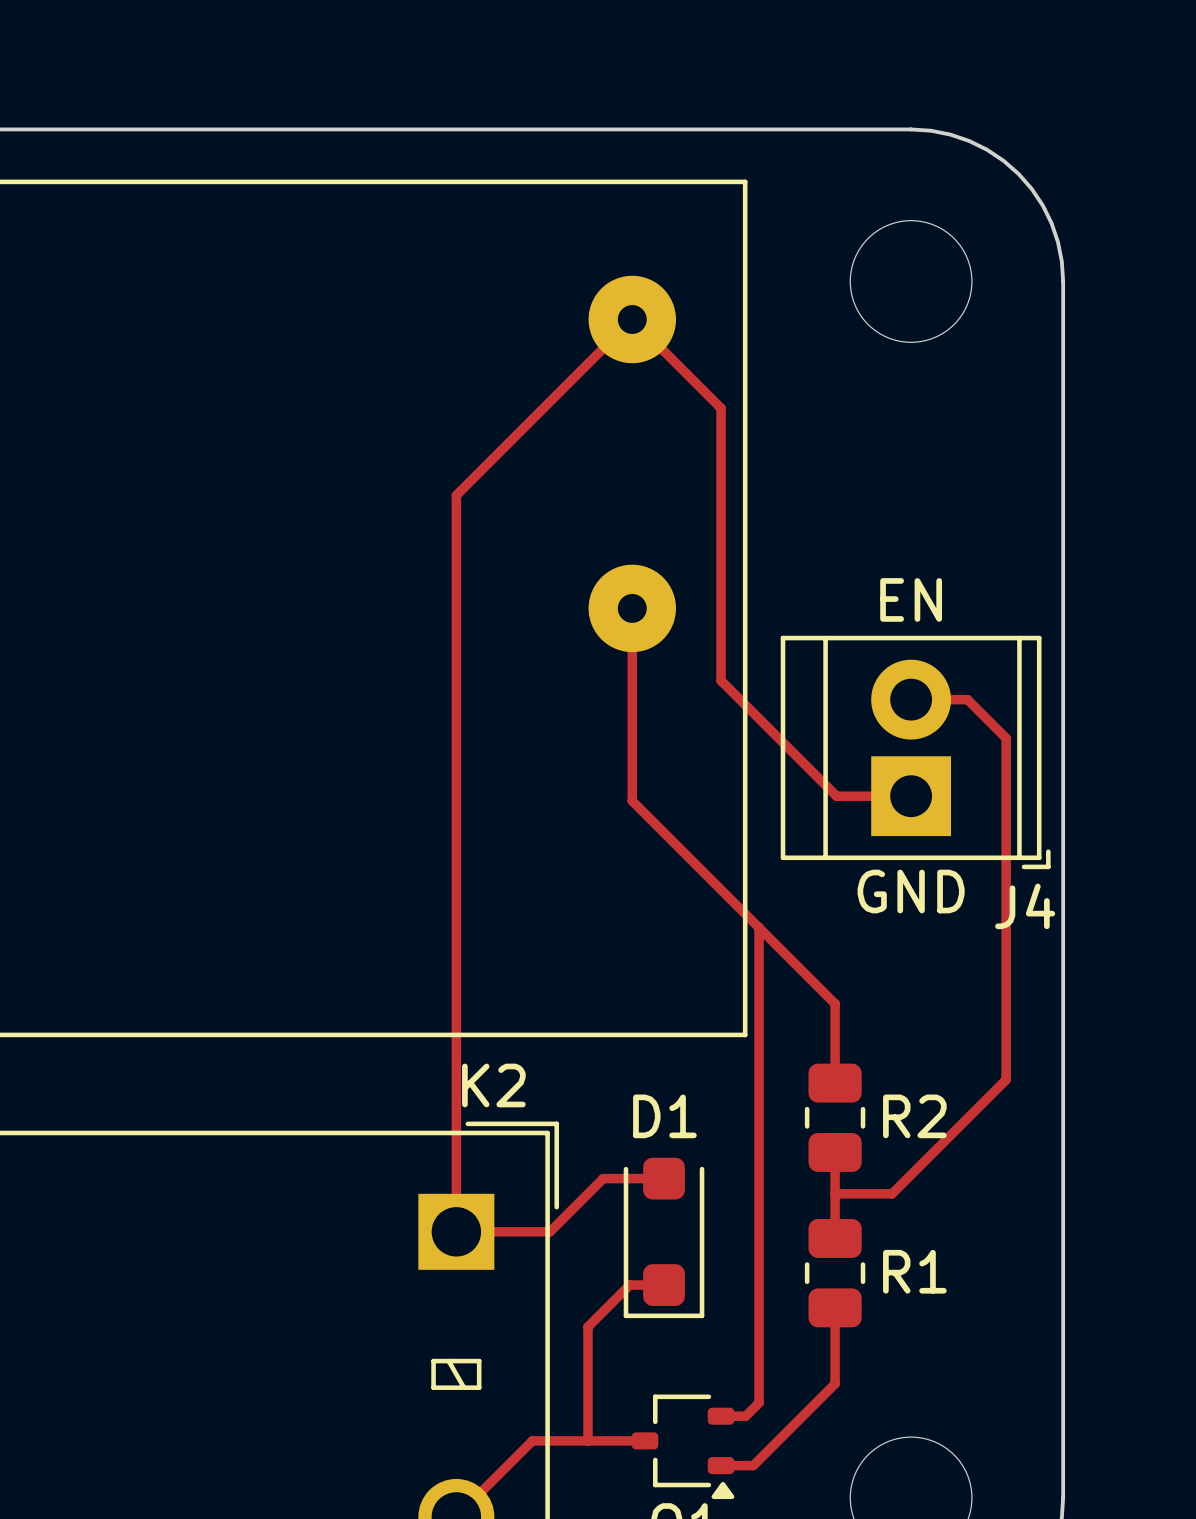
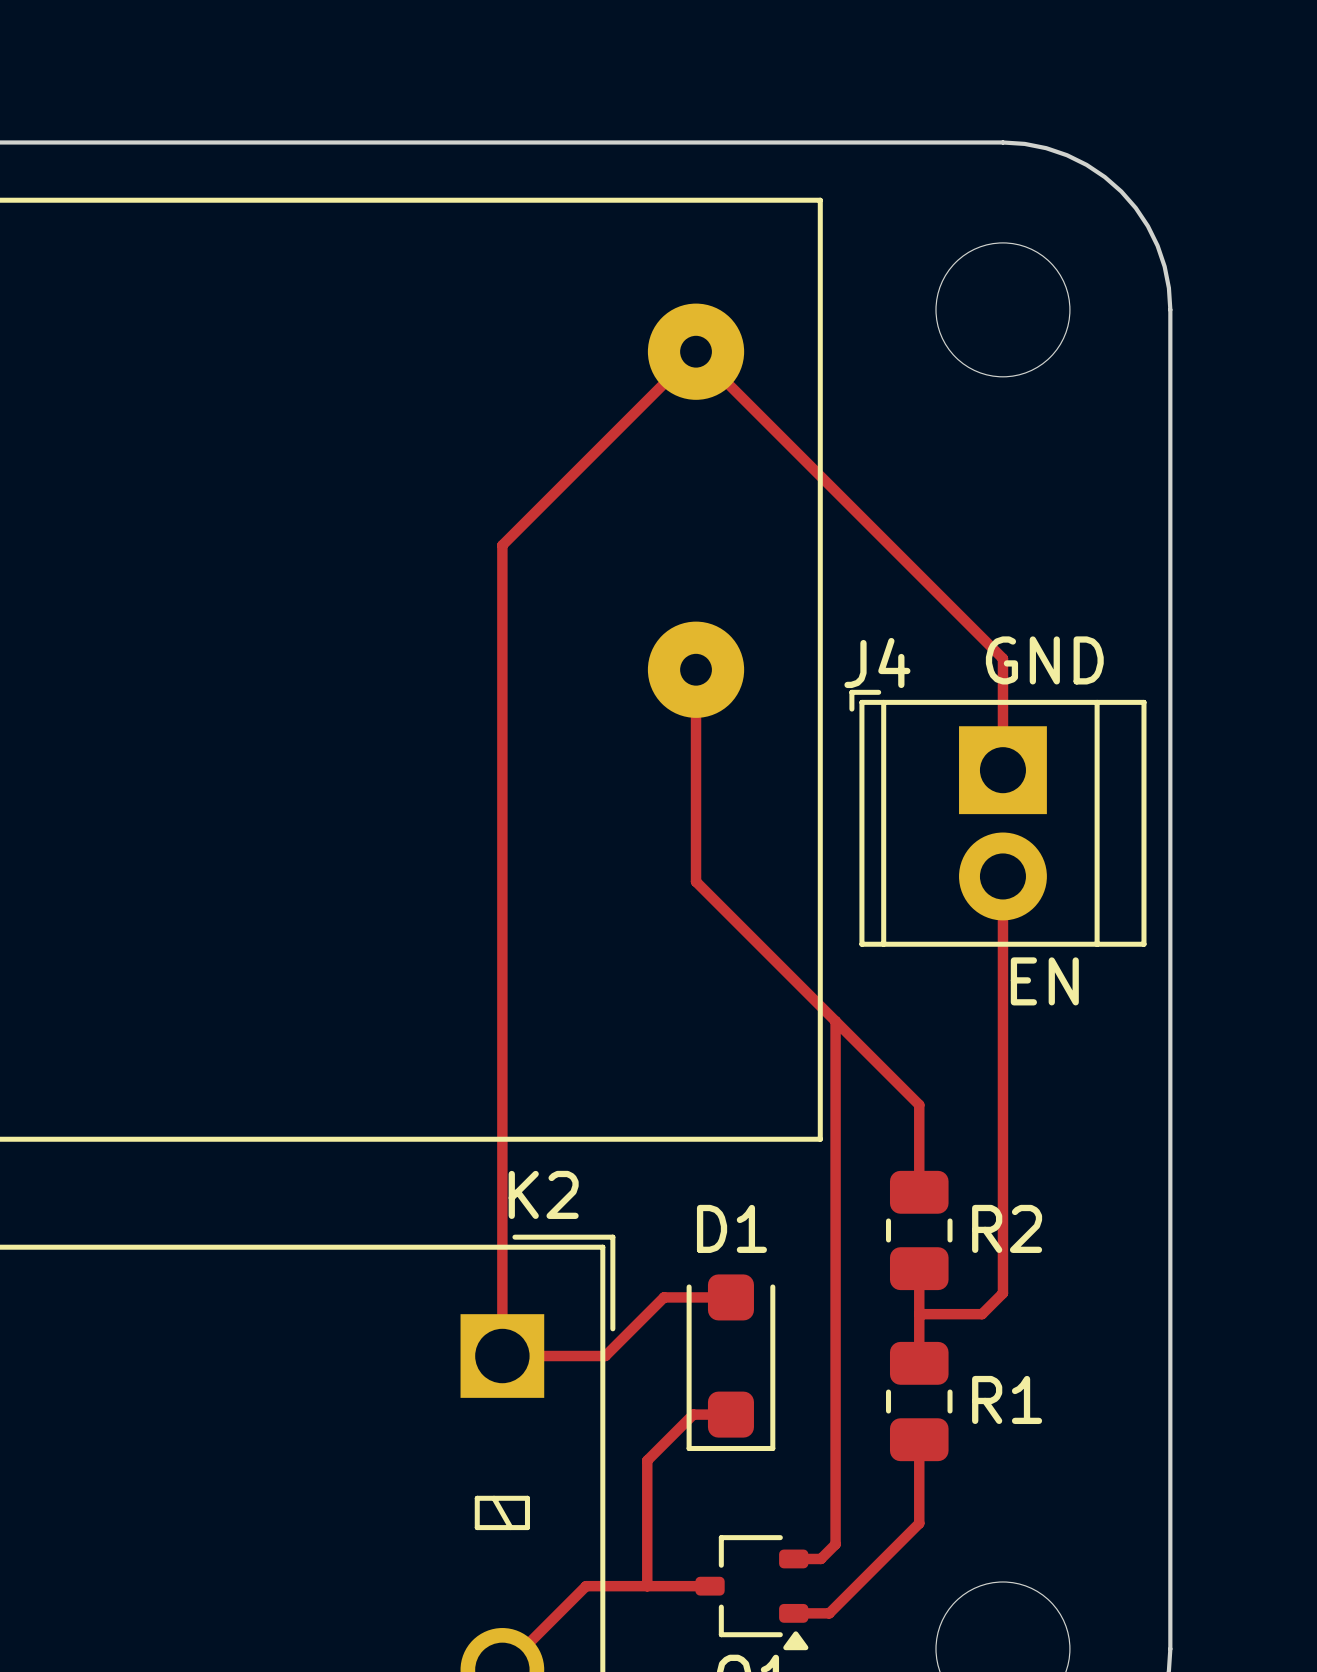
track: (721, 408) (721, 680) (836, 796) (911, 796) -> (793, 449) (1002, 658) (1002, 770)
text: EN (911, 599) -> GND (1044, 660)
track: (911, 699) (967, 699) (1006, 738) (1006, 1079) (911, 1174) -> (1002, 876) (1002, 1293)
J4 rotation: 0° (915, 752) -> 180° (997, 818)
text: GND (911, 891) -> EN (1044, 981)

